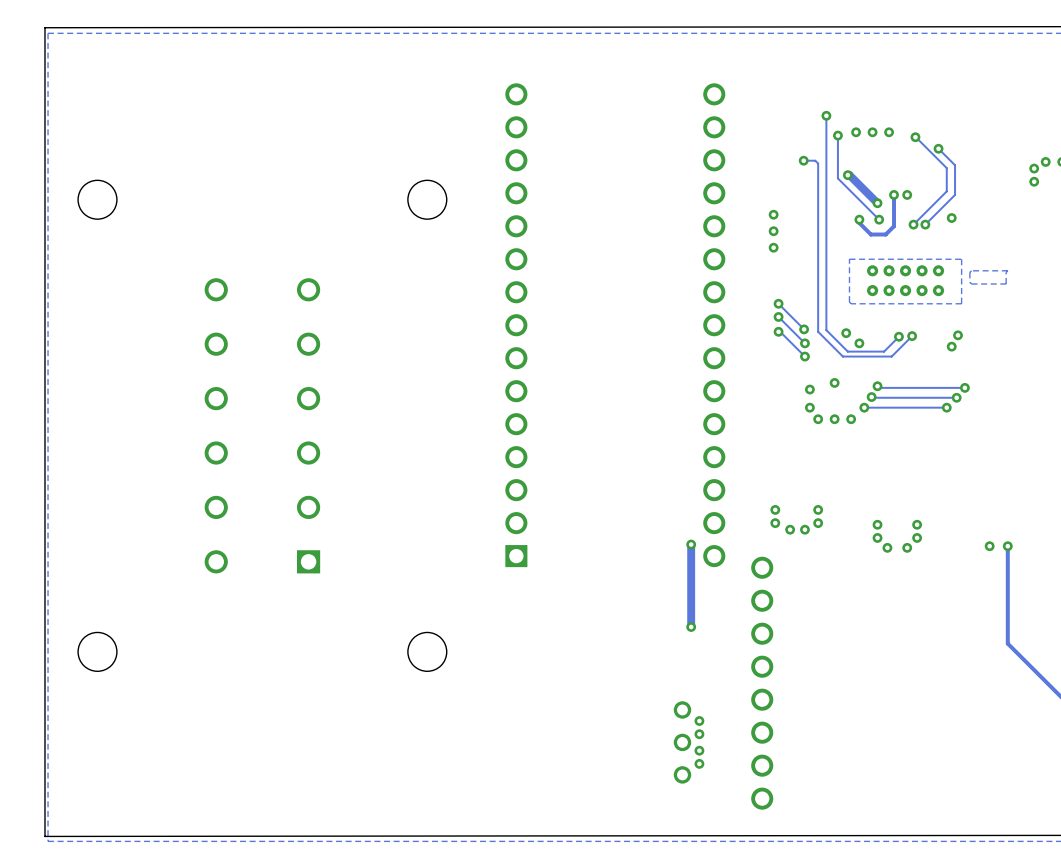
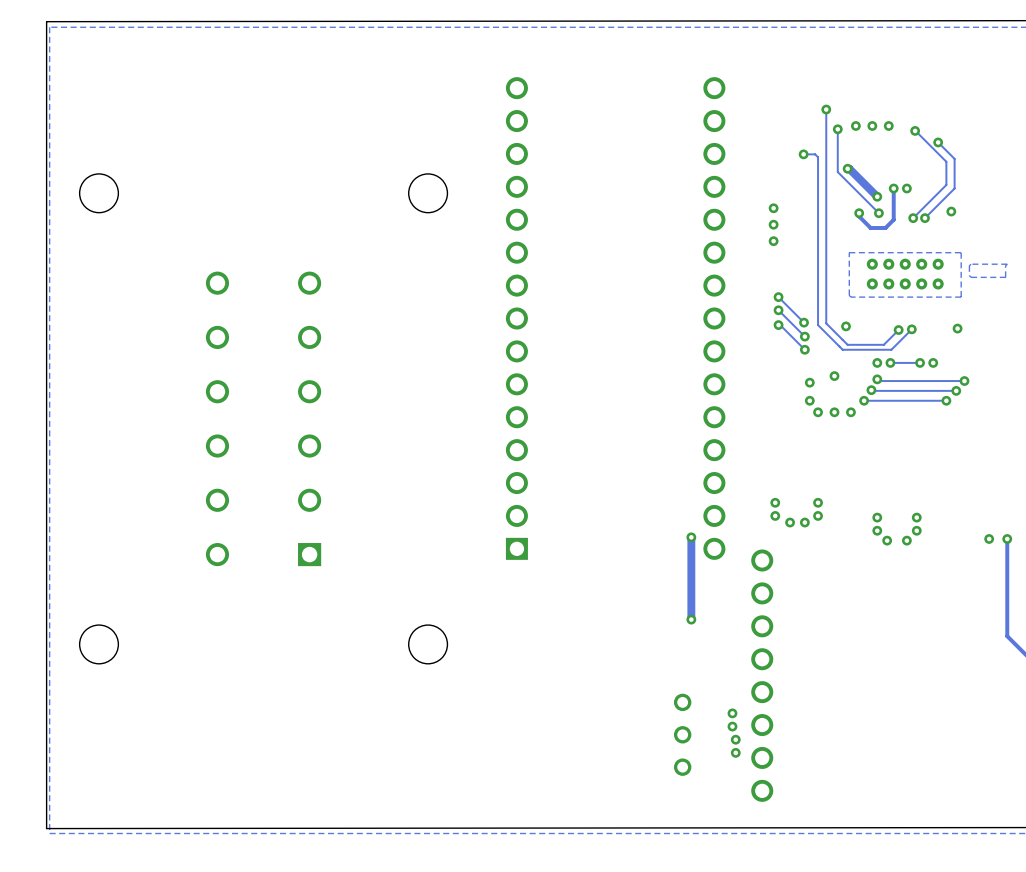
via: (859, 343) -> none
via: (951, 346) -> none
via: none -> (877, 362)
via: none -> (890, 362)
track: none -> (920, 362) (890, 362)
via: none -> (920, 362)
via: none -> (933, 362)
via: (699, 721) -> none
via: none -> (732, 713)
via: (699, 734) -> none
via: none -> (732, 726)
via: none -> (735, 739)
via: (699, 750) -> none
via: none -> (735, 752)
via: (699, 763) -> none

